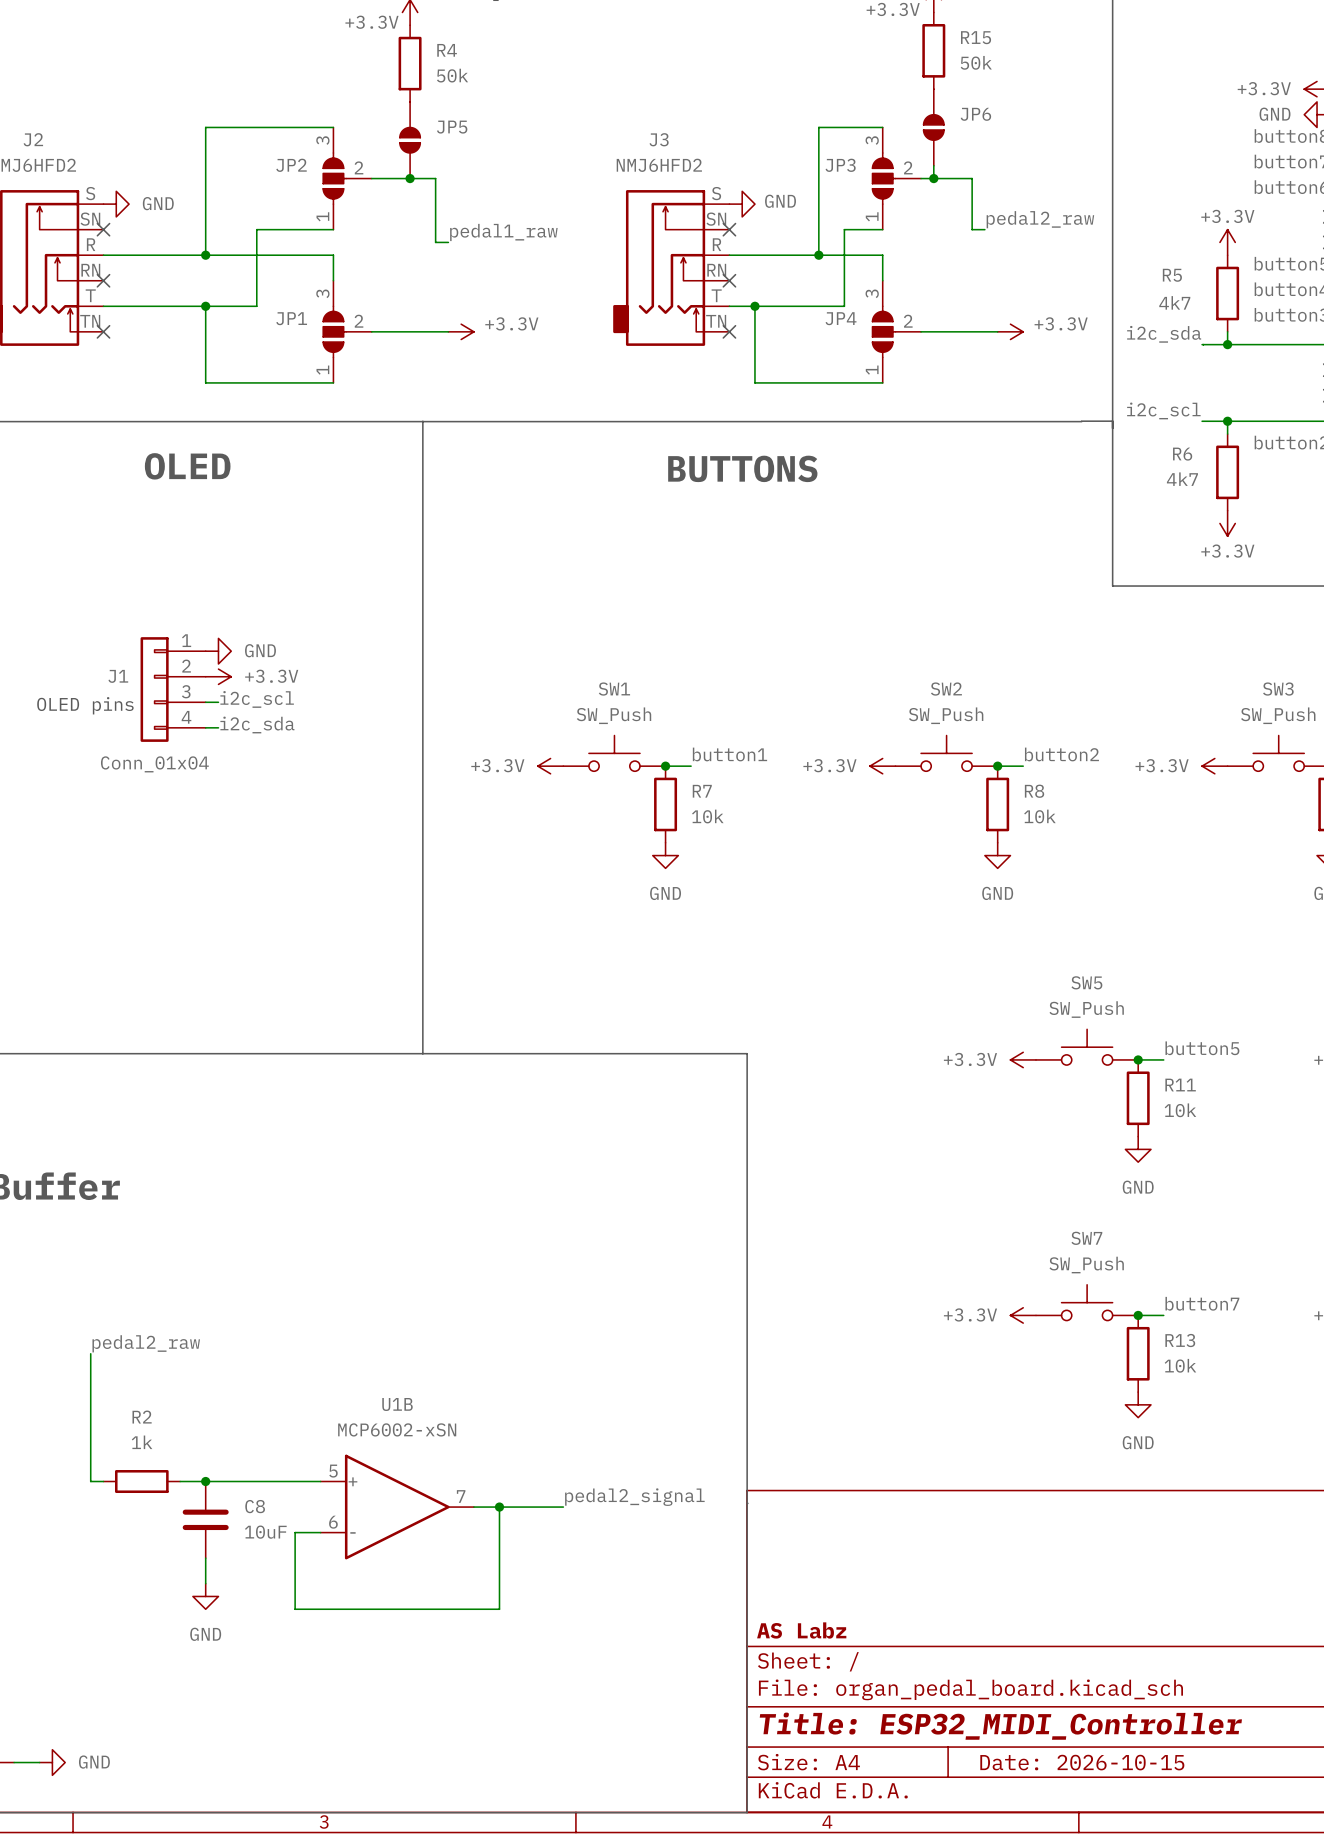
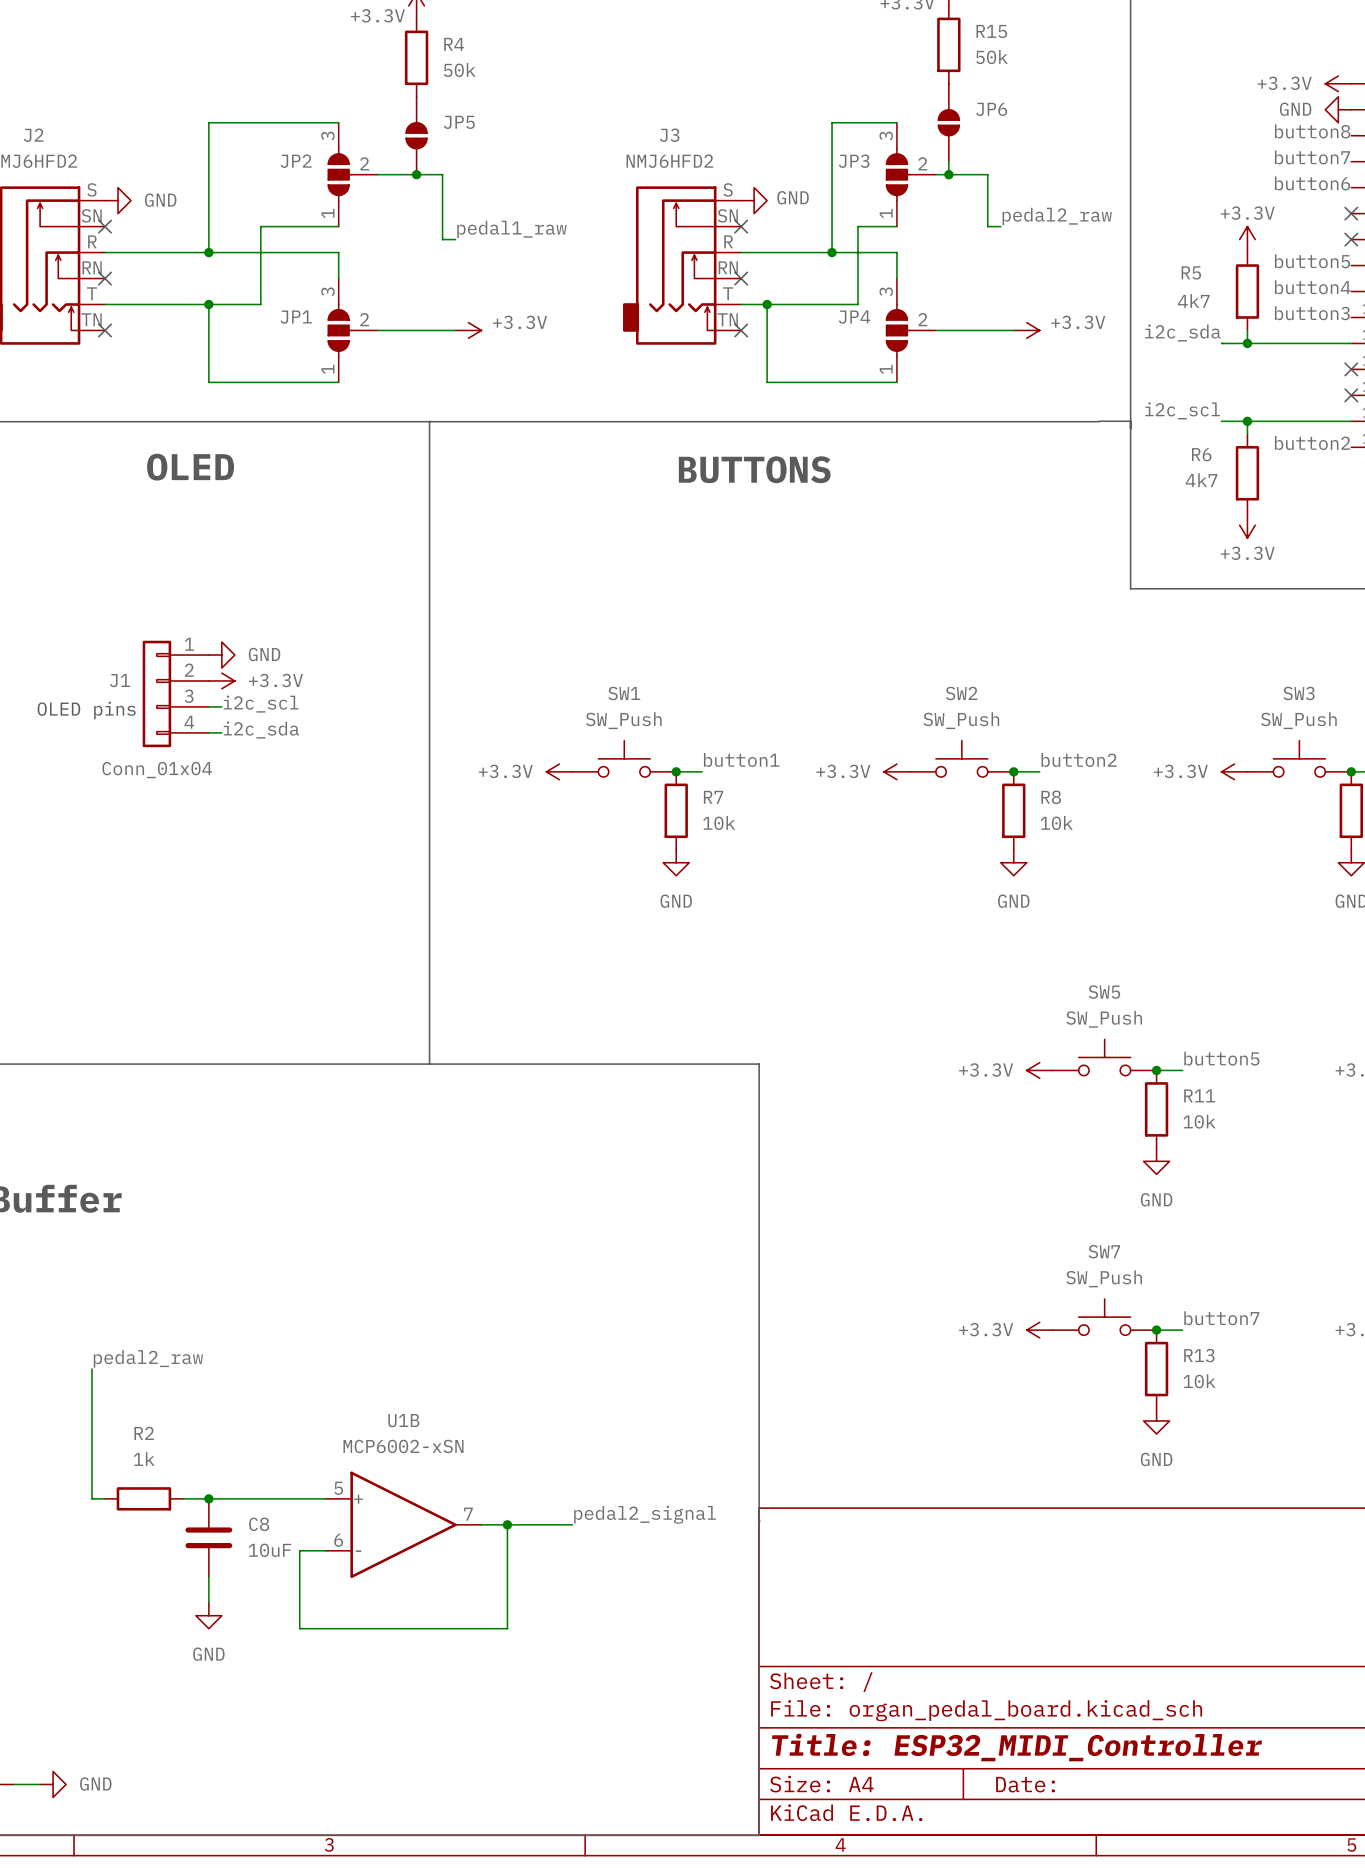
title block: AS Labz (801, 1630) -> none
title block: Date: 2026-10-15 (1082, 1762) -> Date: (1025, 1784)

